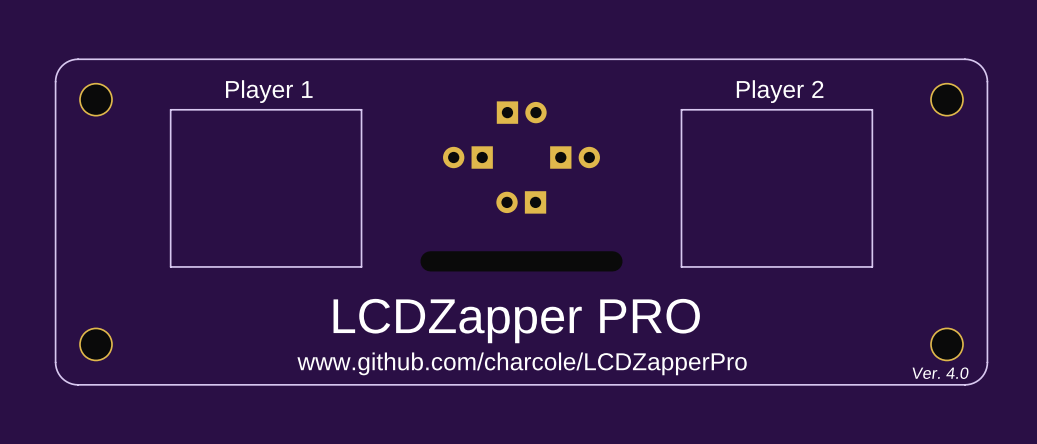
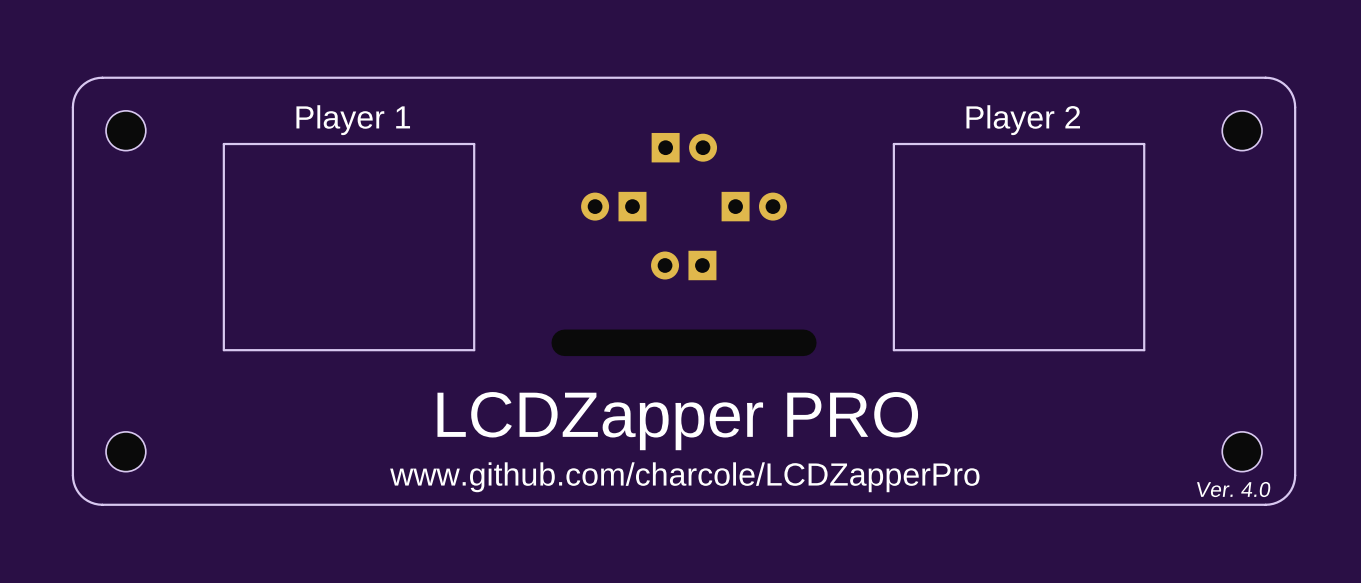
part footprint: [79, 82, 113, 117] -> [106, 110, 146, 151]
part footprint: [930, 82, 964, 117] -> [1222, 110, 1263, 151]
part footprint: [79, 327, 113, 362] -> [106, 431, 146, 472]
part footprint: [930, 327, 964, 362] -> [1222, 431, 1263, 472]

